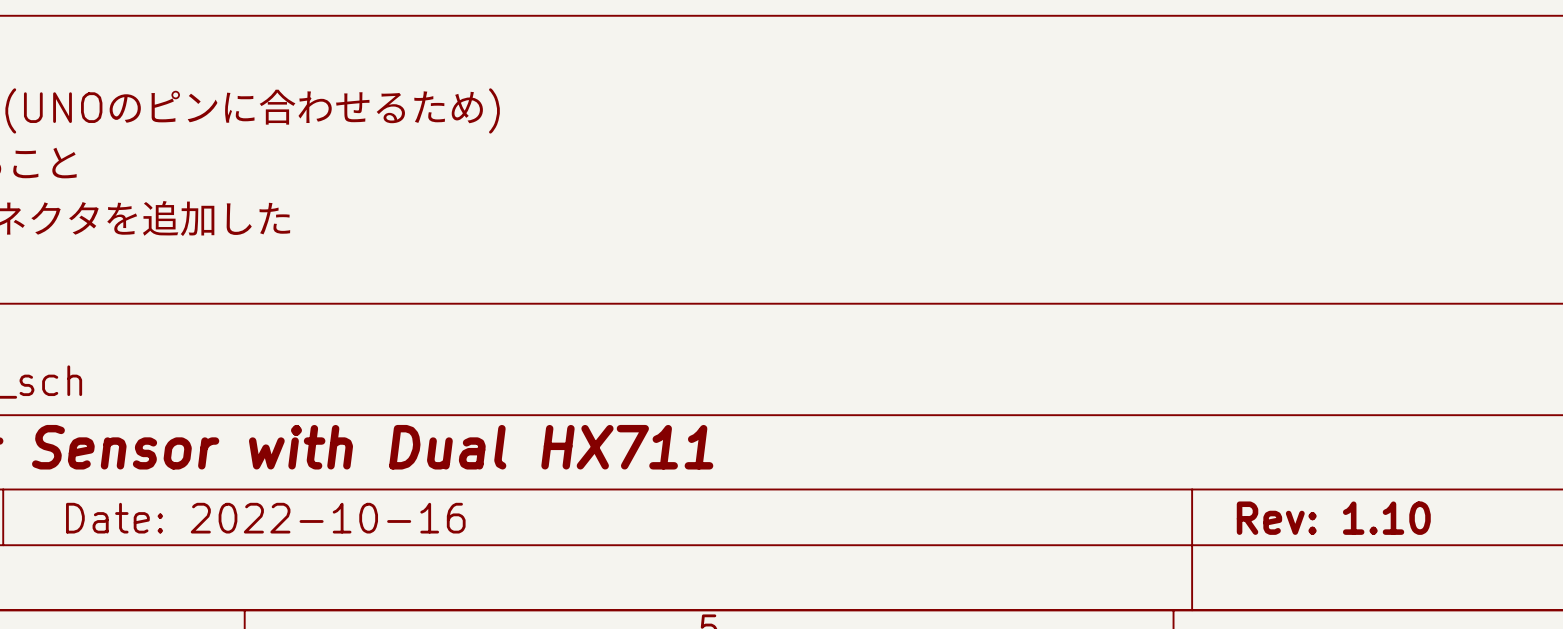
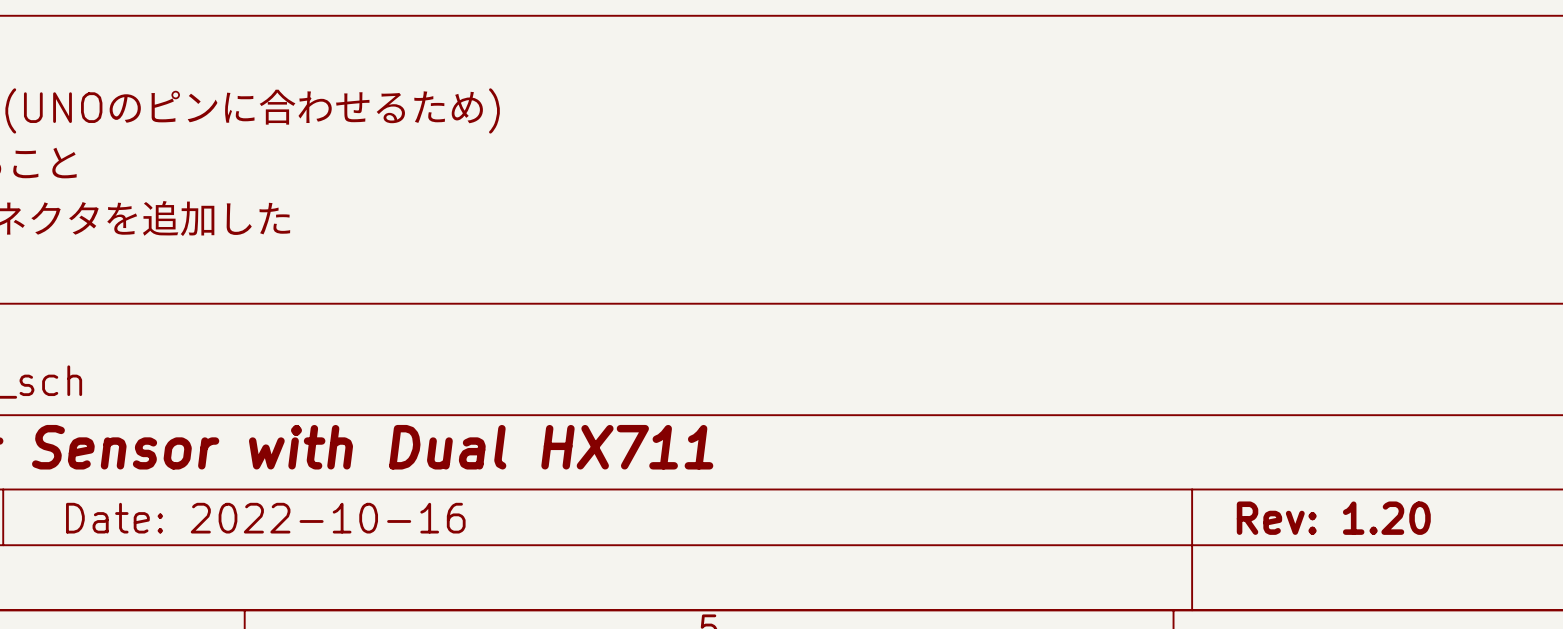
title block: Rev: 1.10 (1333, 518) -> Rev: 1.20 (1333, 518)

